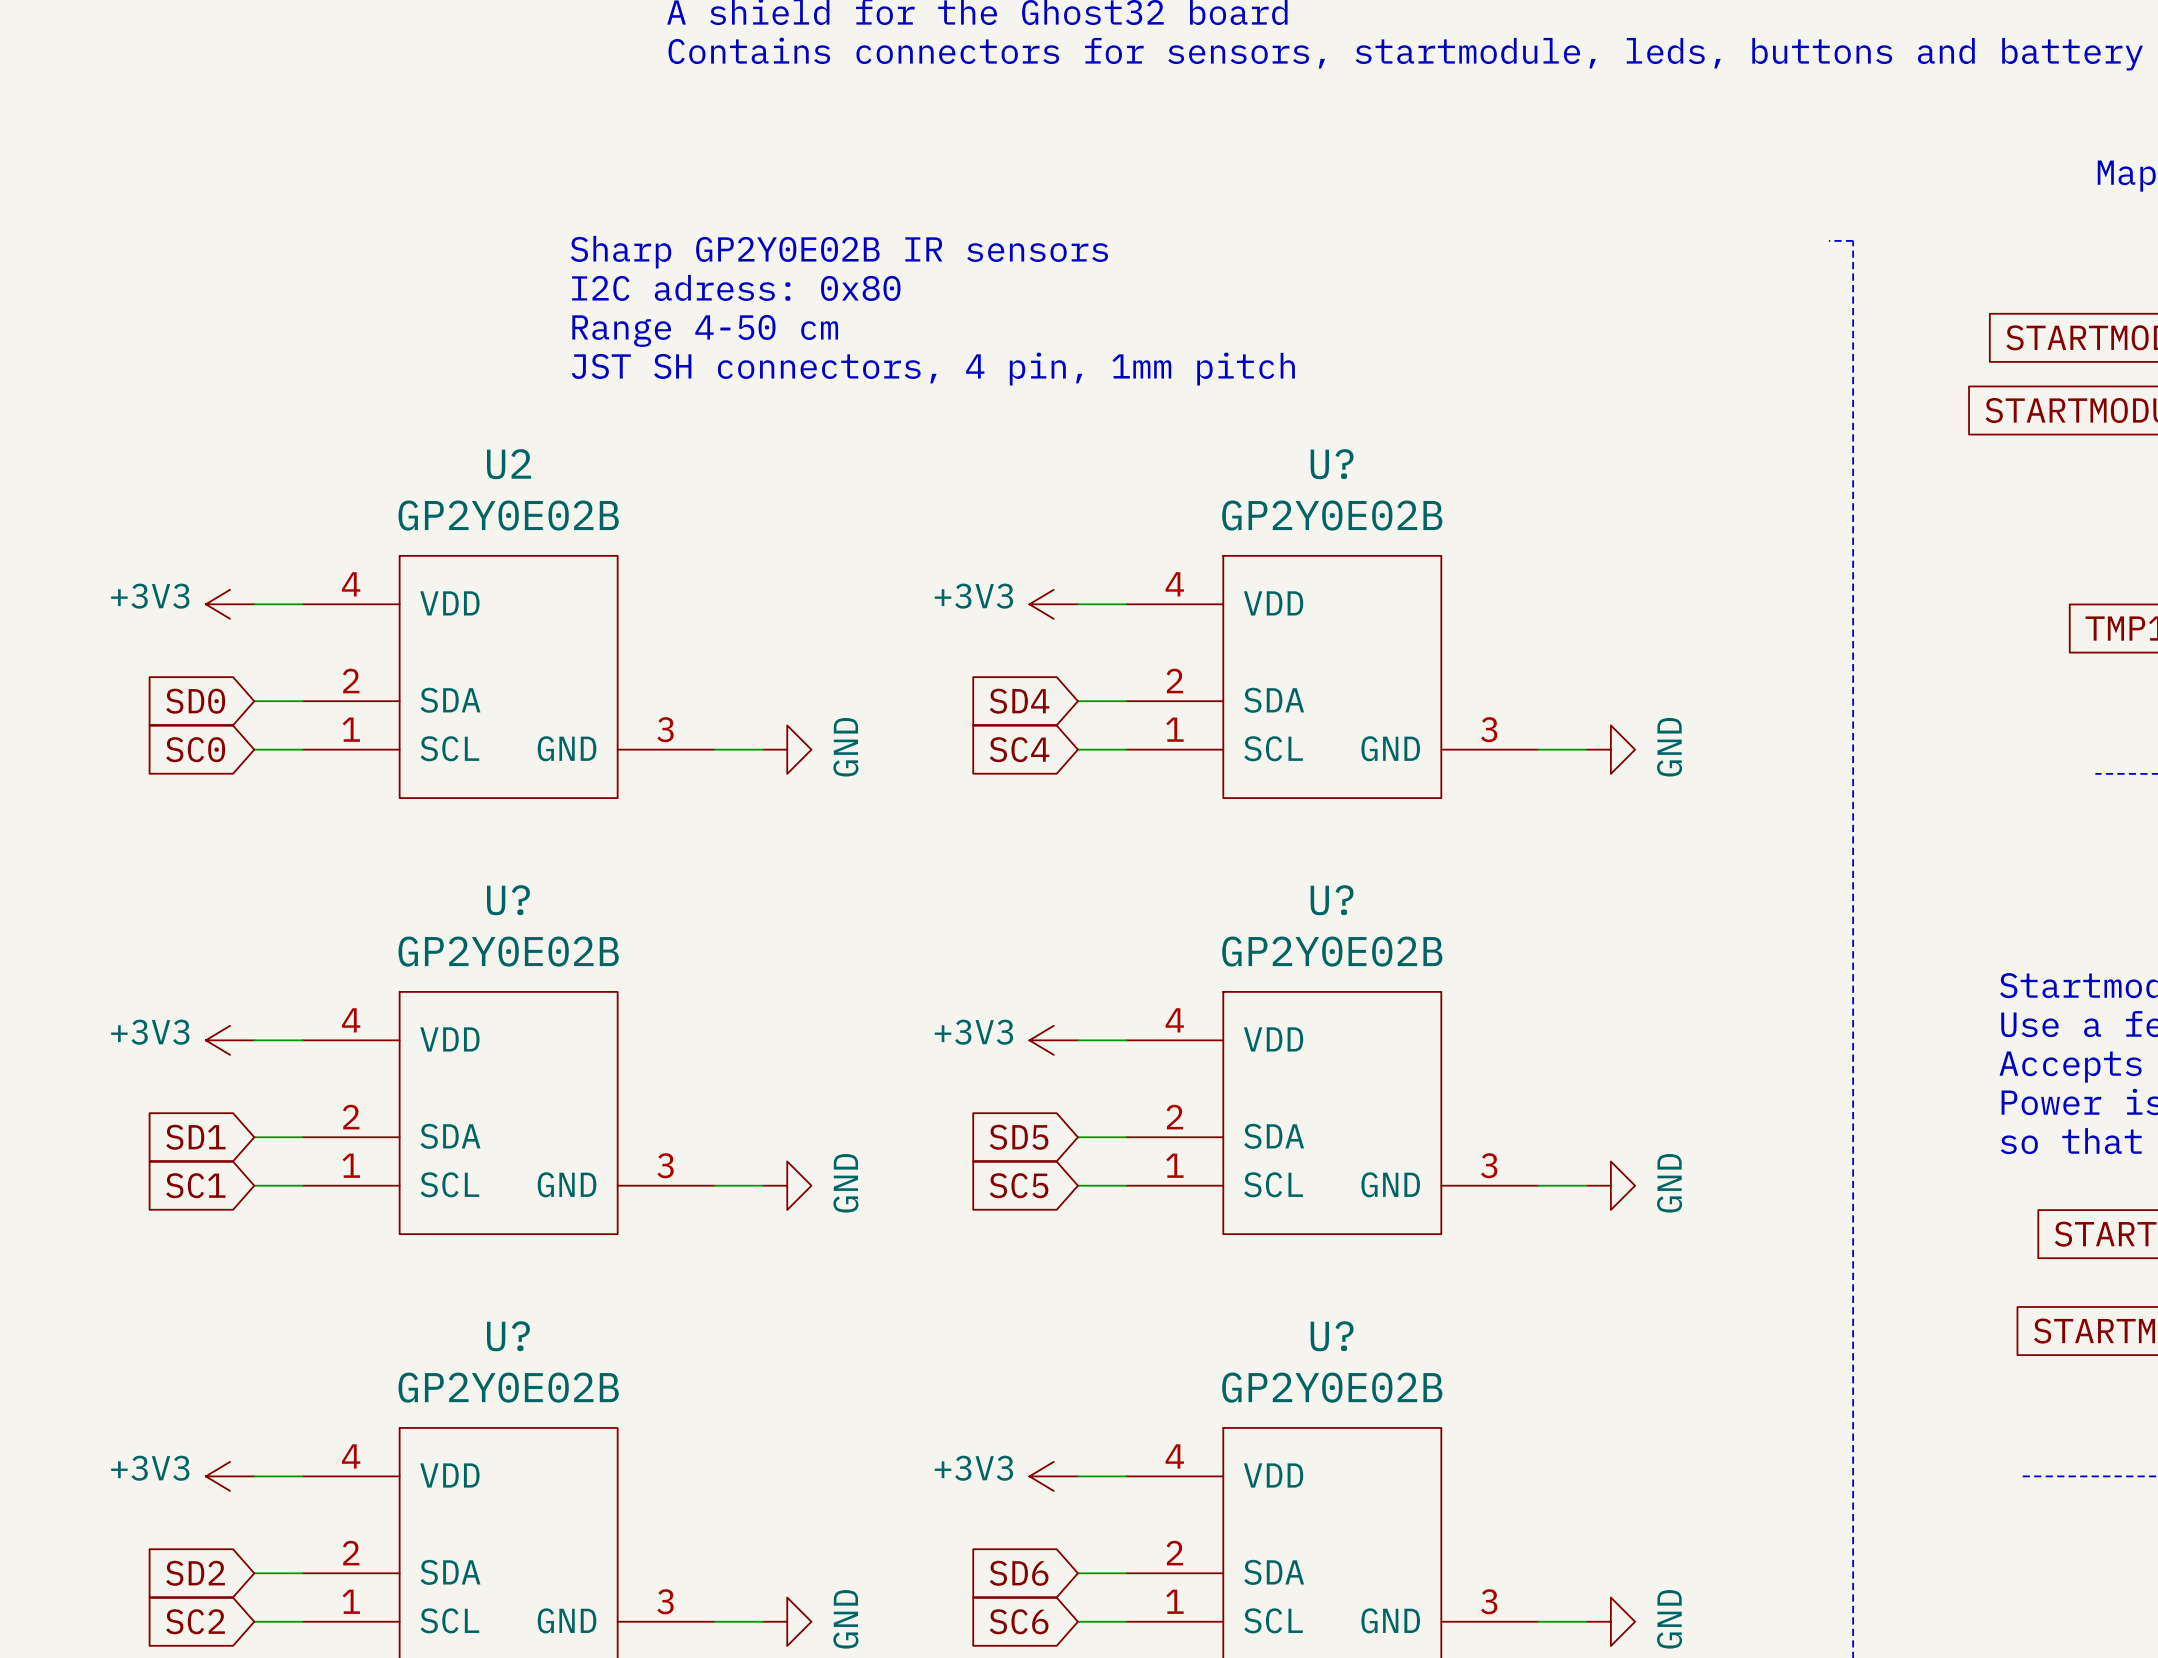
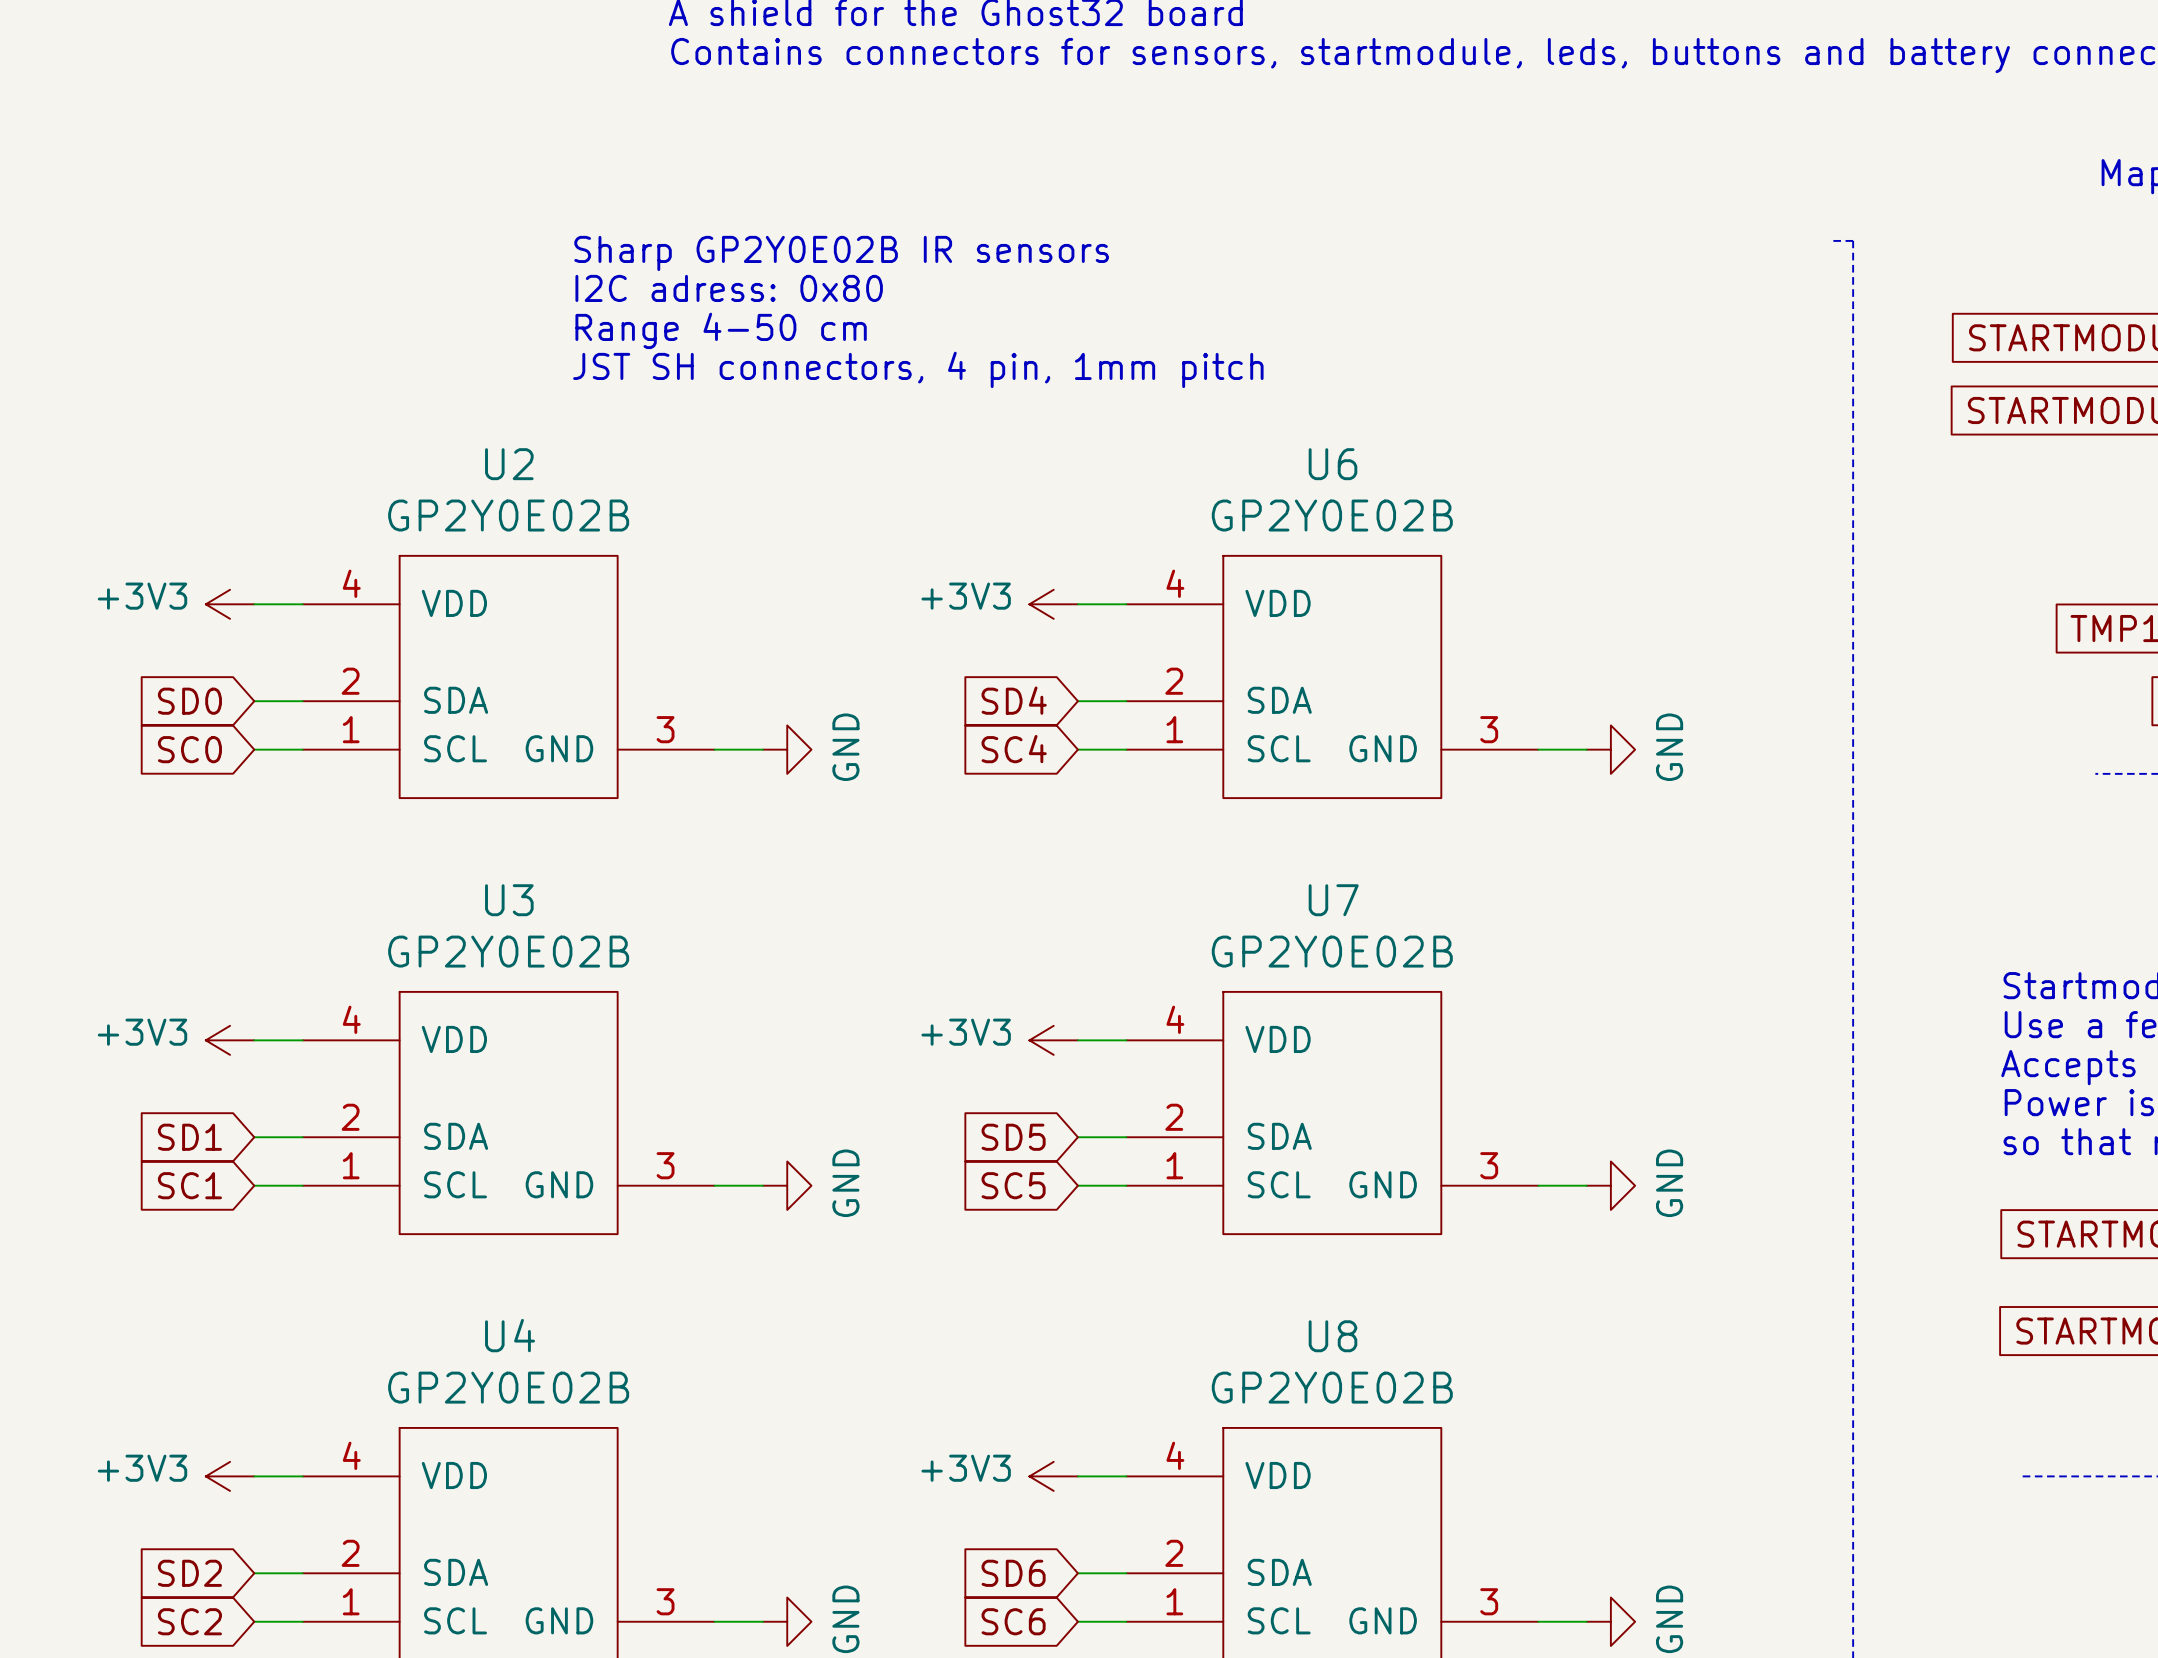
U? name: U? (1332, 464) -> U6 (1332, 464)
U? name: U? (508, 900) -> U3 (509, 900)
U? name: U? (1332, 900) -> U7 (1333, 900)
U? name: U? (508, 1336) -> U4 (510, 1335)
U? name: U? (1332, 1336) -> U8 (1332, 1336)

